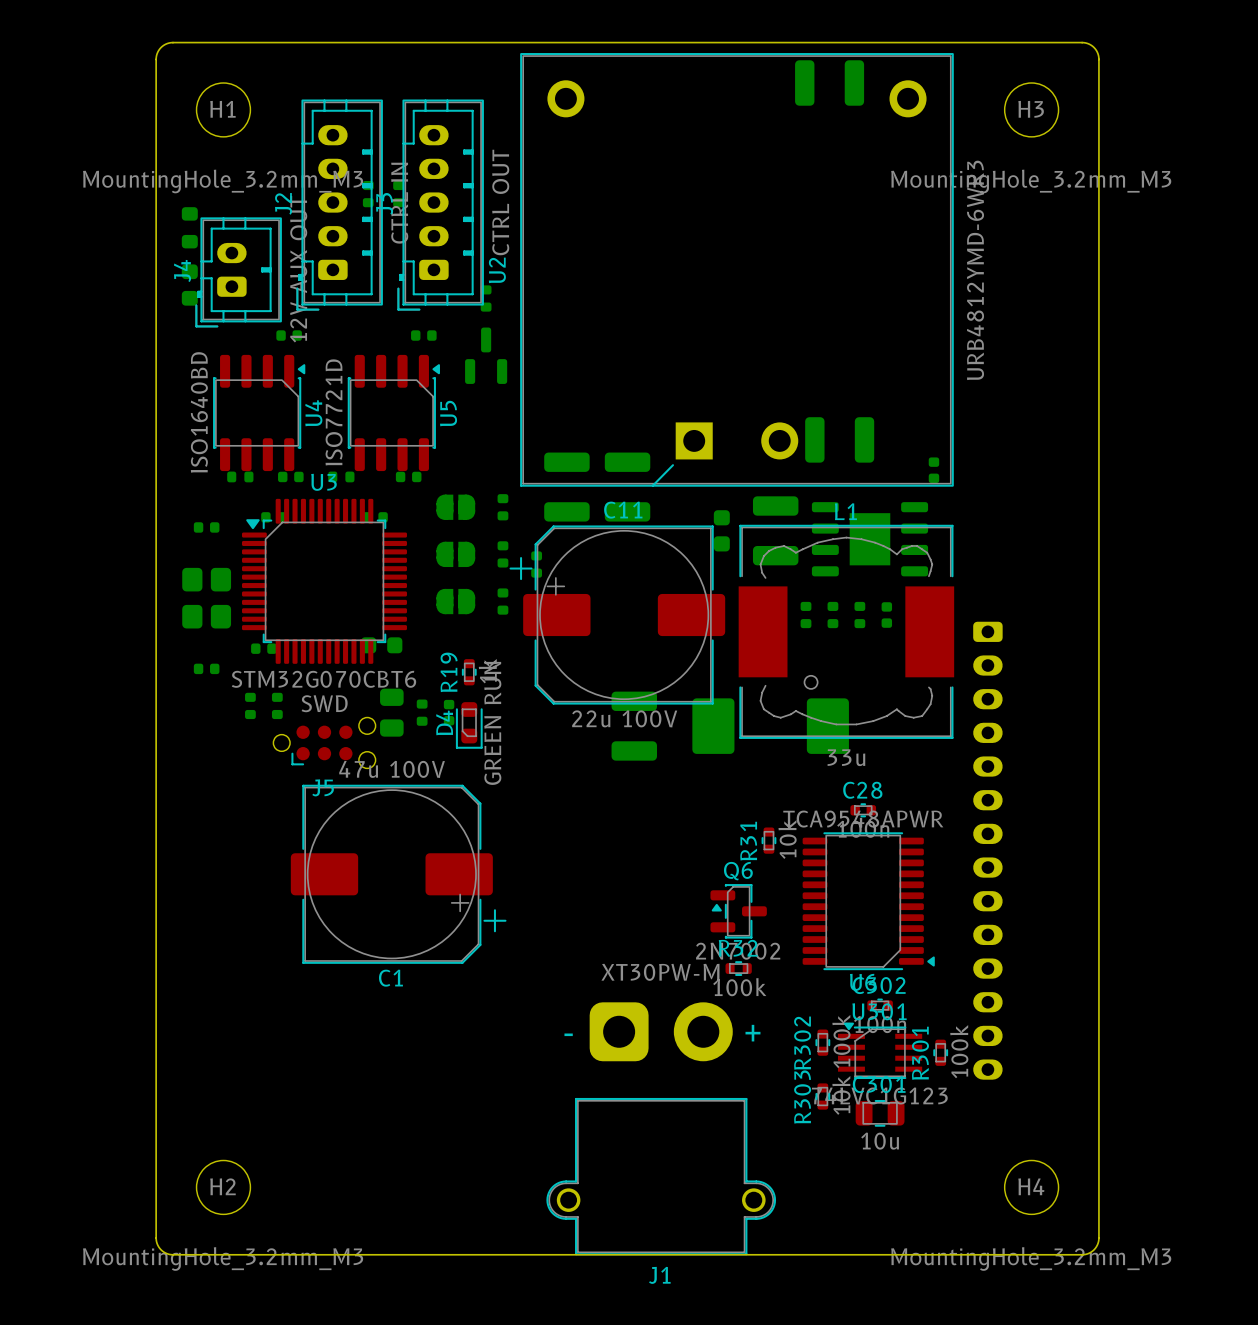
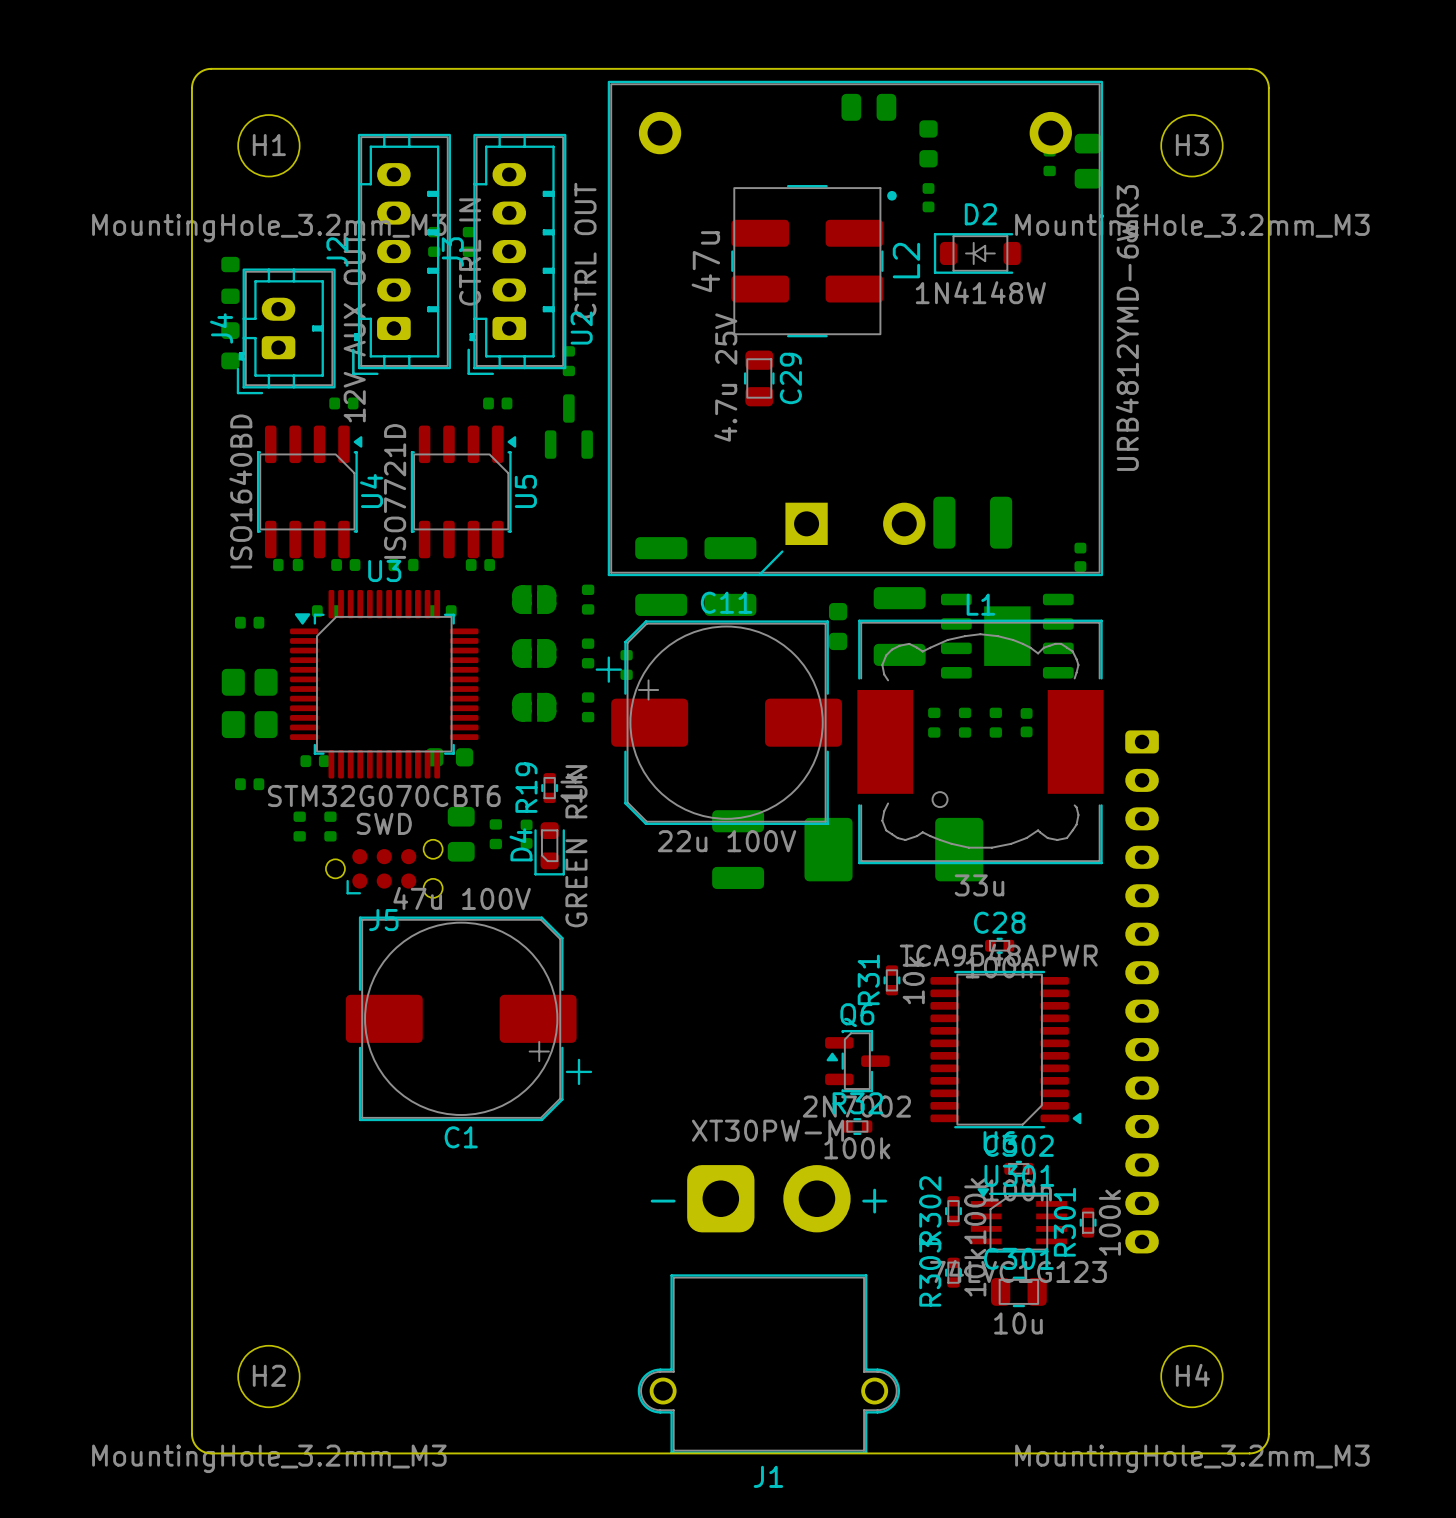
part: none -> (868, 107)
part: (829, 82) -> none
part: none -> (928, 143)
part: none -> (1049, 161)
part: none -> (1088, 161)
part: none -> (928, 197)
D2: none -> 1N4148W (977, 253)
L2: none -> 47u (813, 261)
C29: none -> 4.7u 25V (759, 378)

